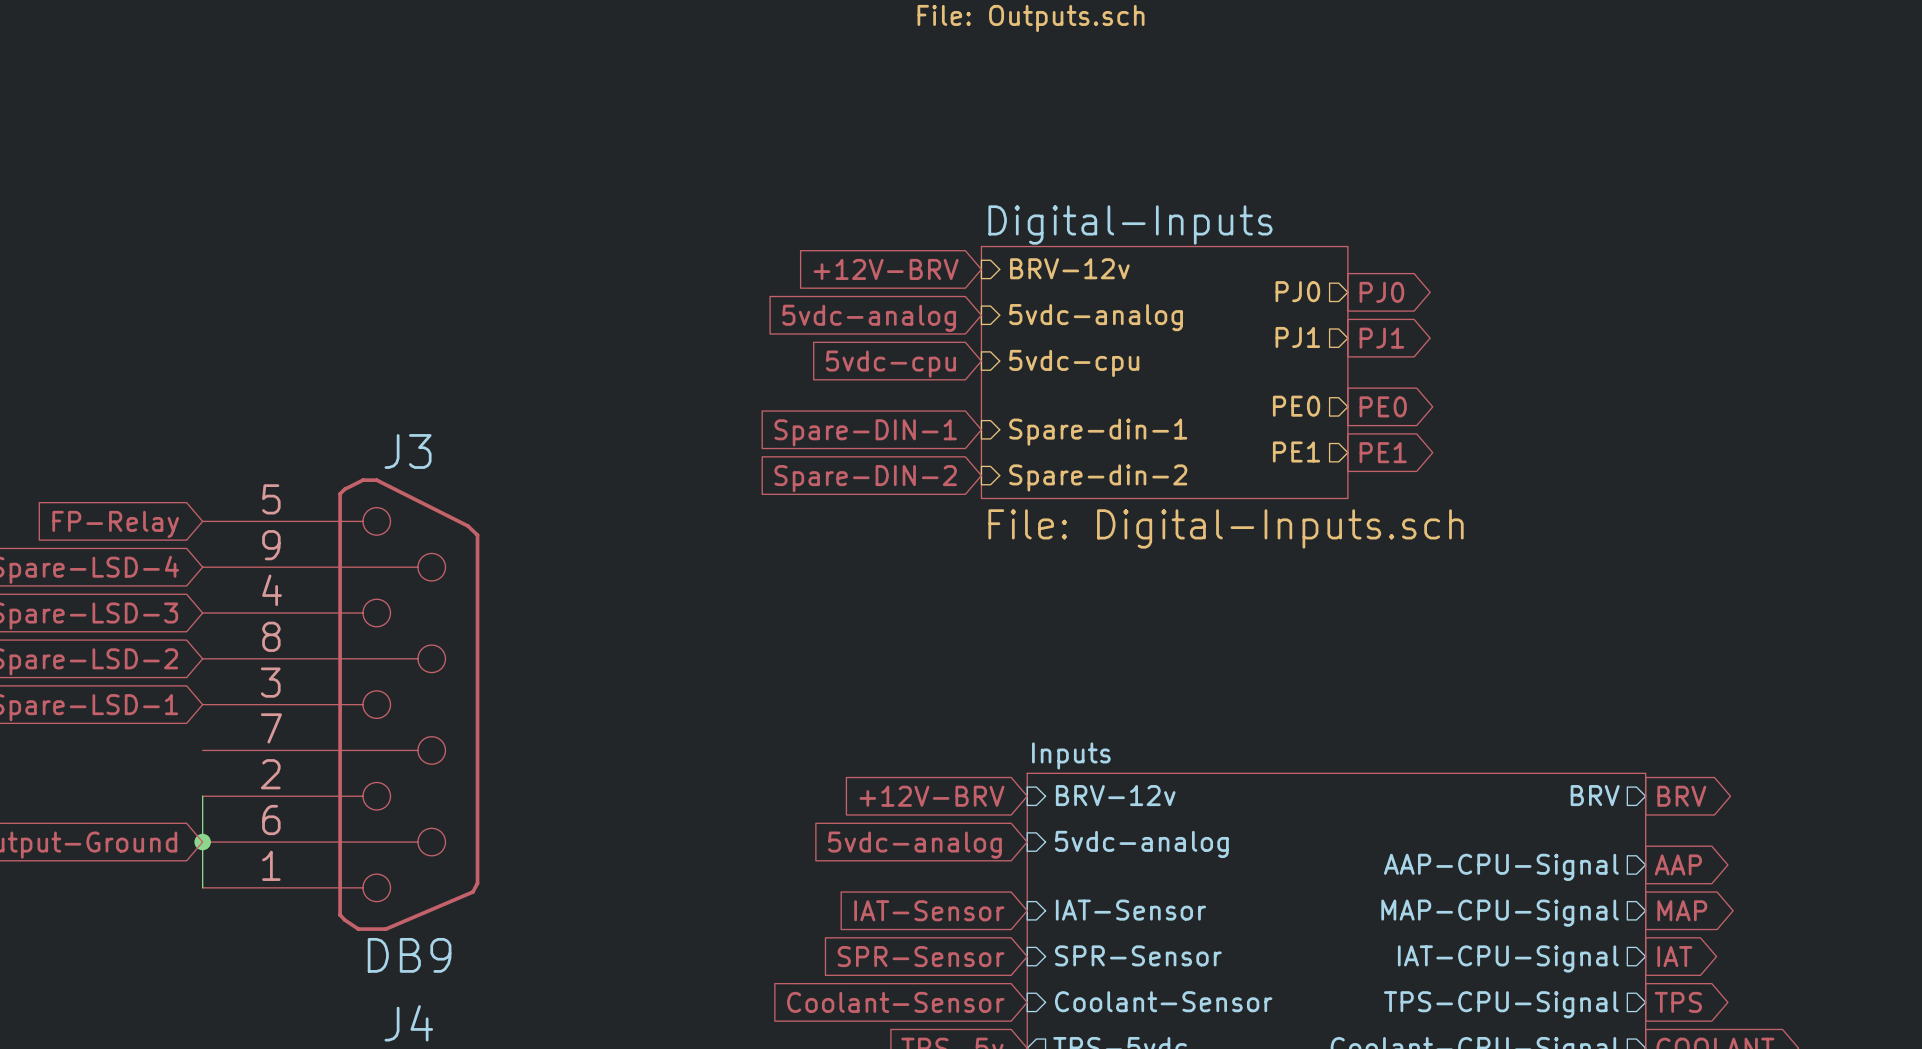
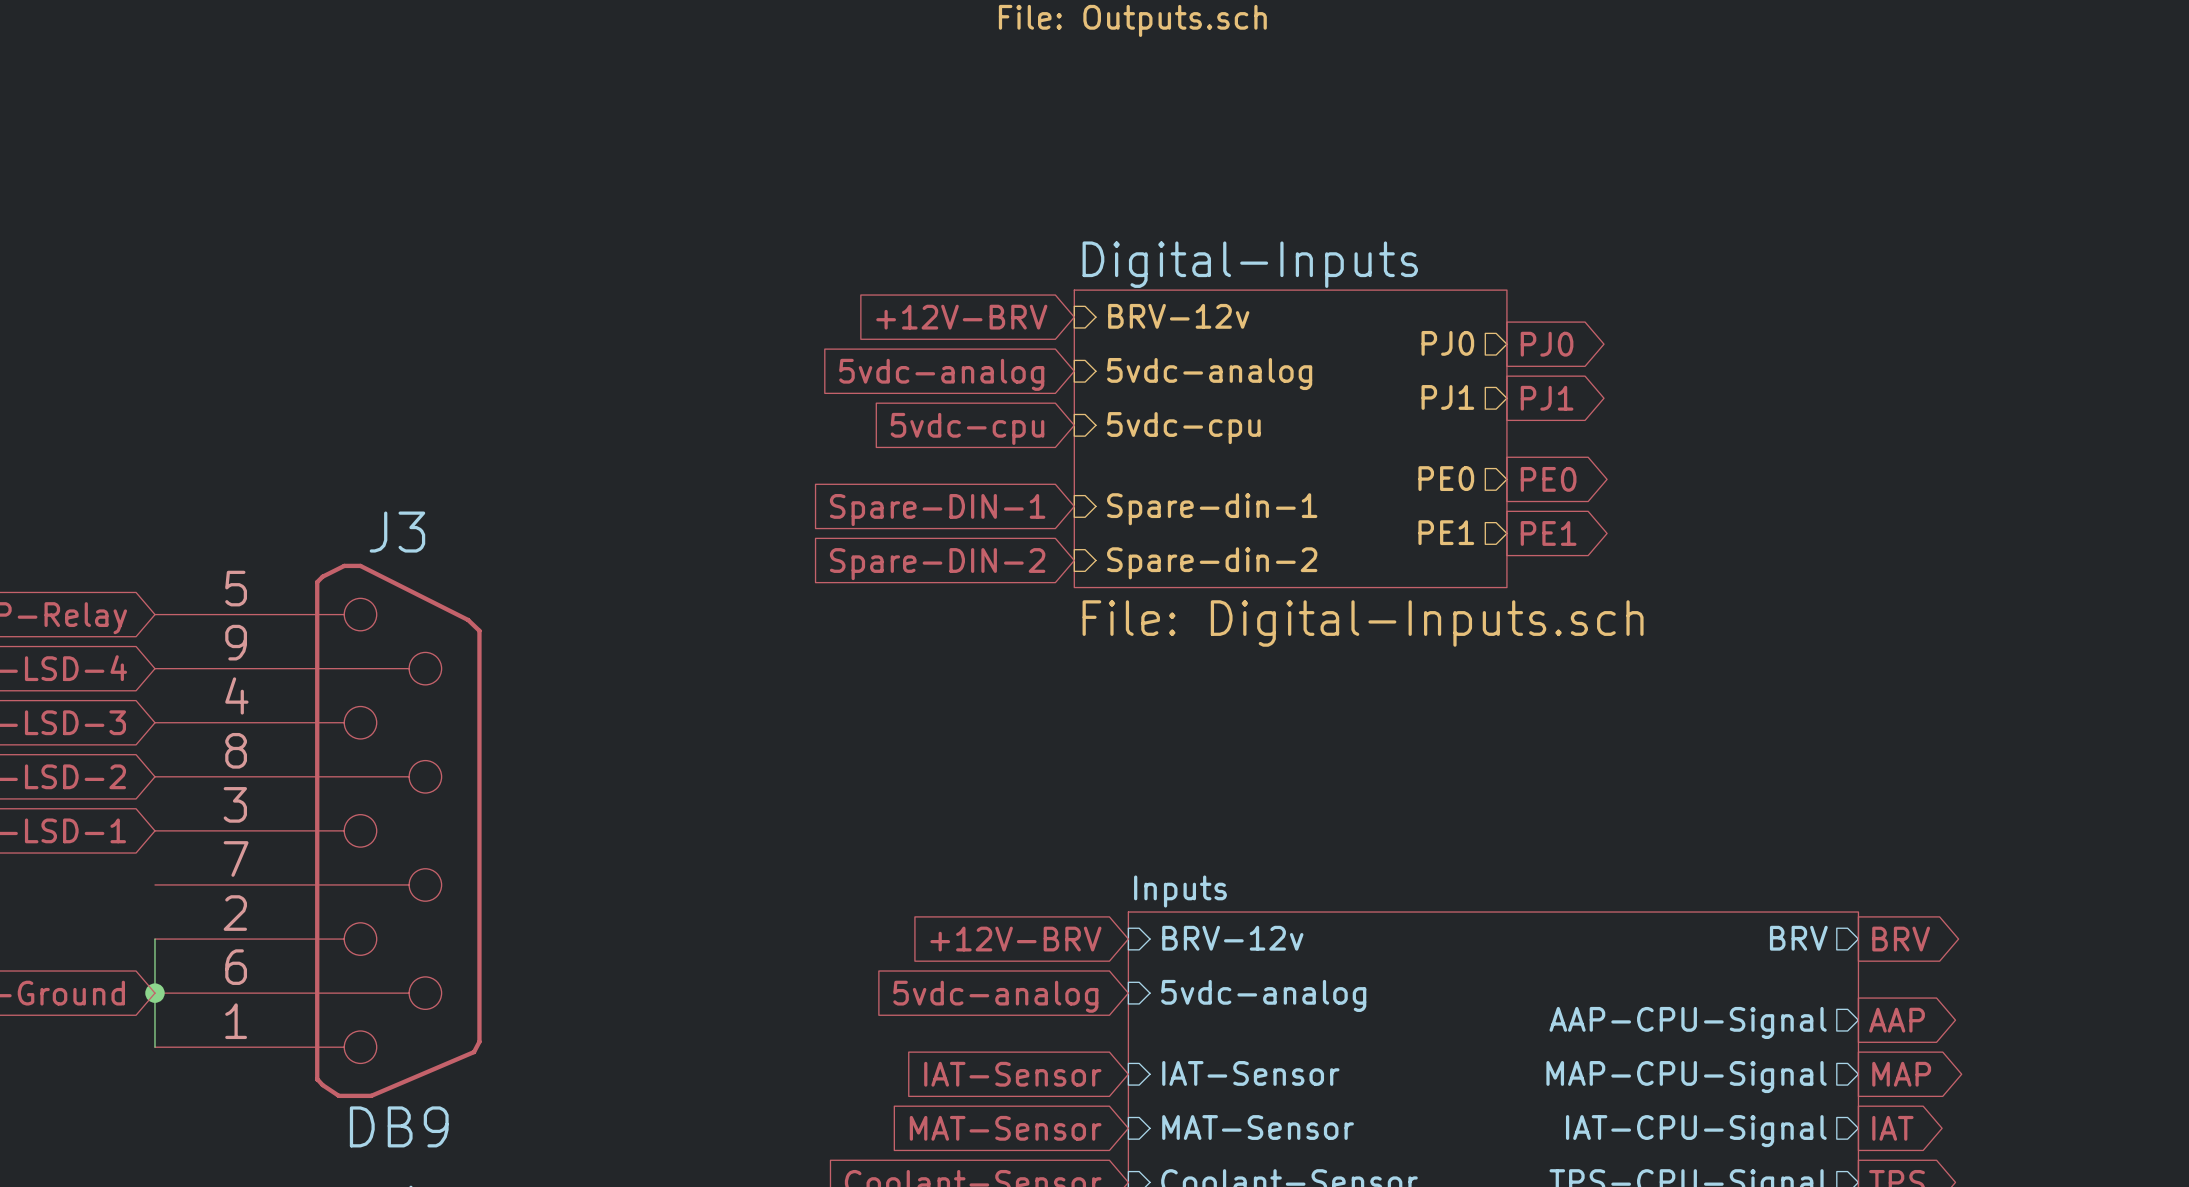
sheet pin: SPR-Sensor (1138, 955) -> MAT-Sensor (1258, 1127)
global label: SPR-Sensor (921, 956) -> MAT-Sensor (1005, 1128)

